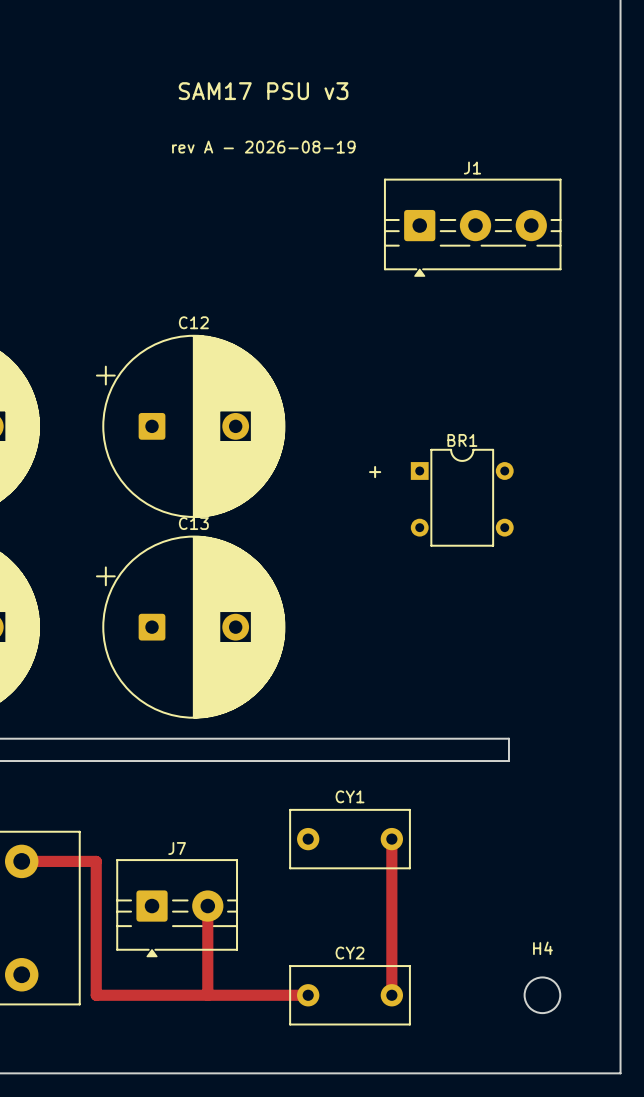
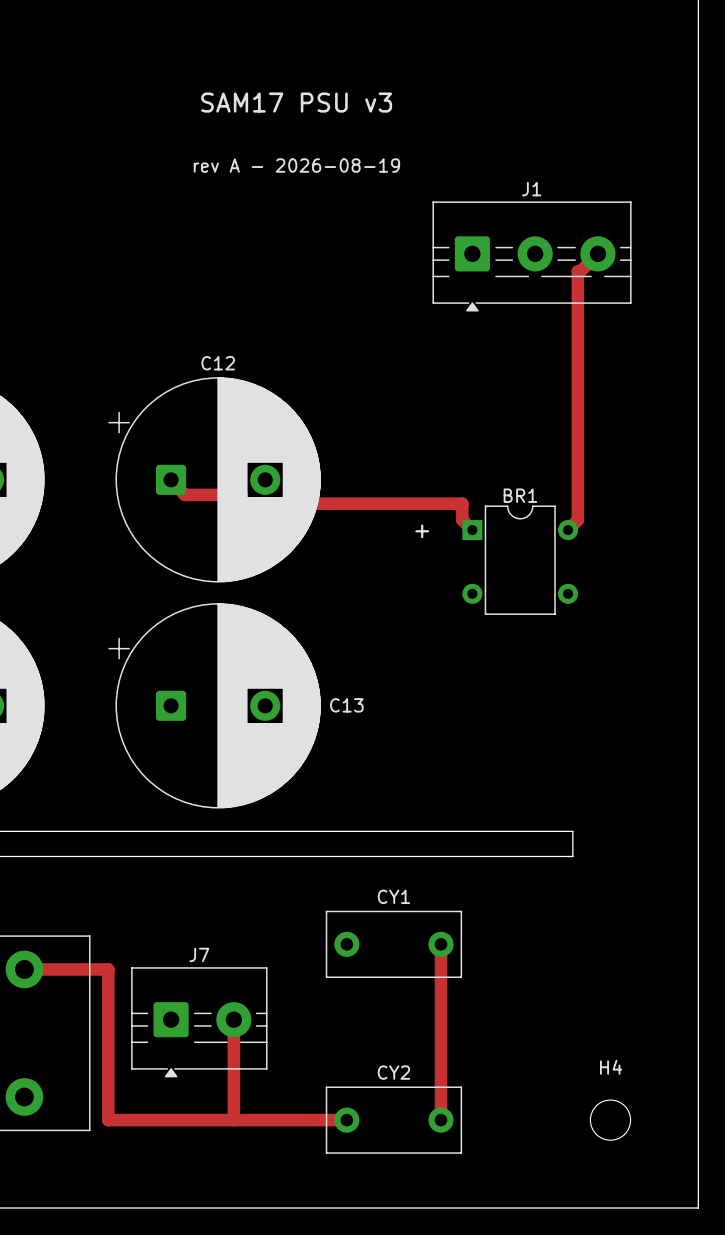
track: none -> (597, 253) (580, 271) (577, 271) (577, 520) (568, 530)
track: none -> (171, 479) (184, 494) (241, 494) (241, 503) (462, 503) (462, 520) (472, 530)
C13 name position: C13 (193, 523) -> C13 (346, 705)

